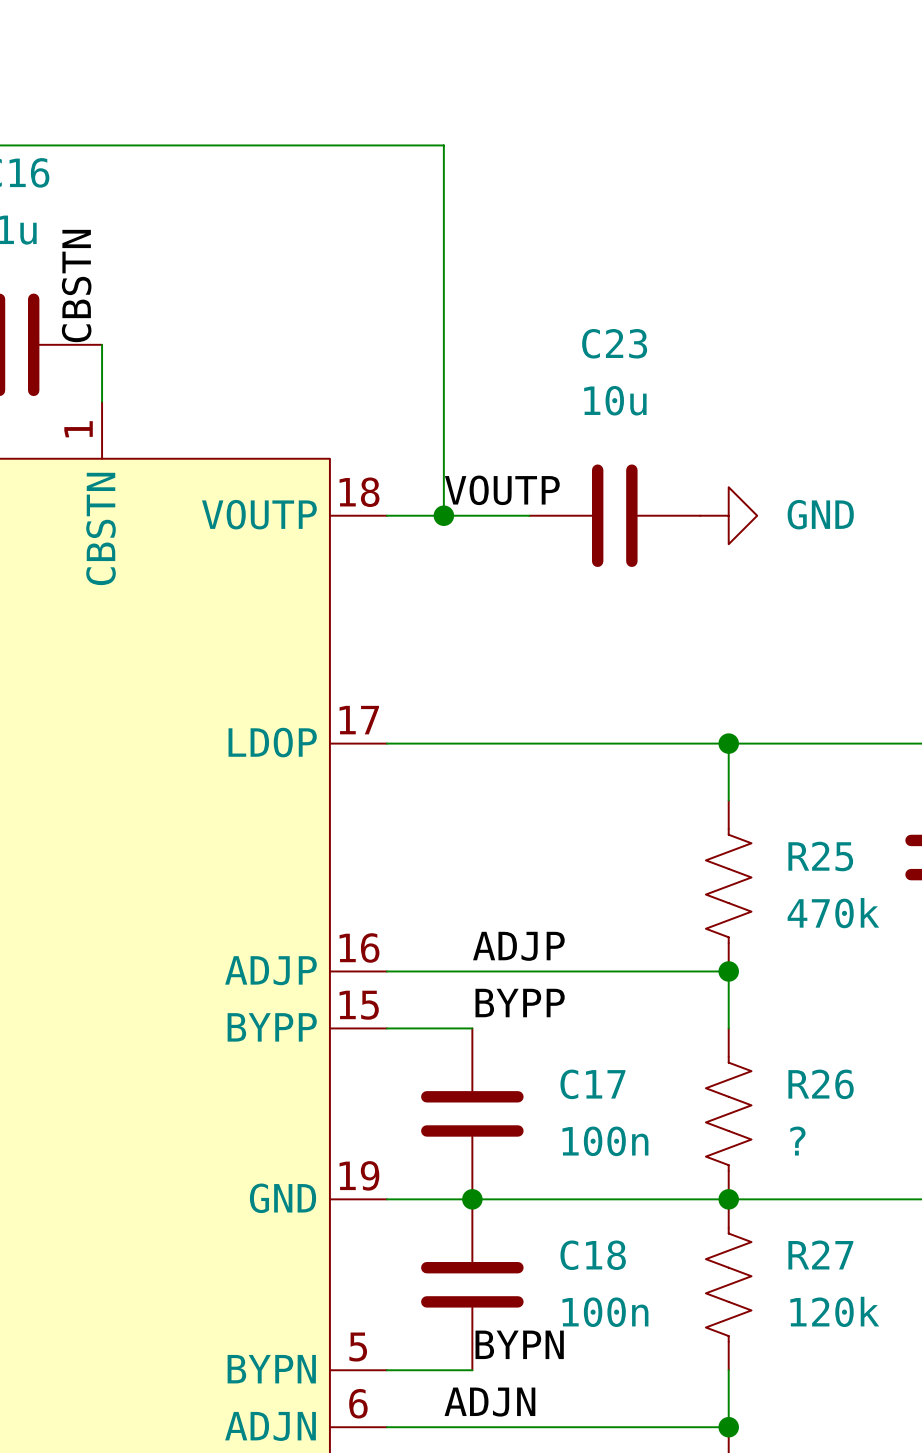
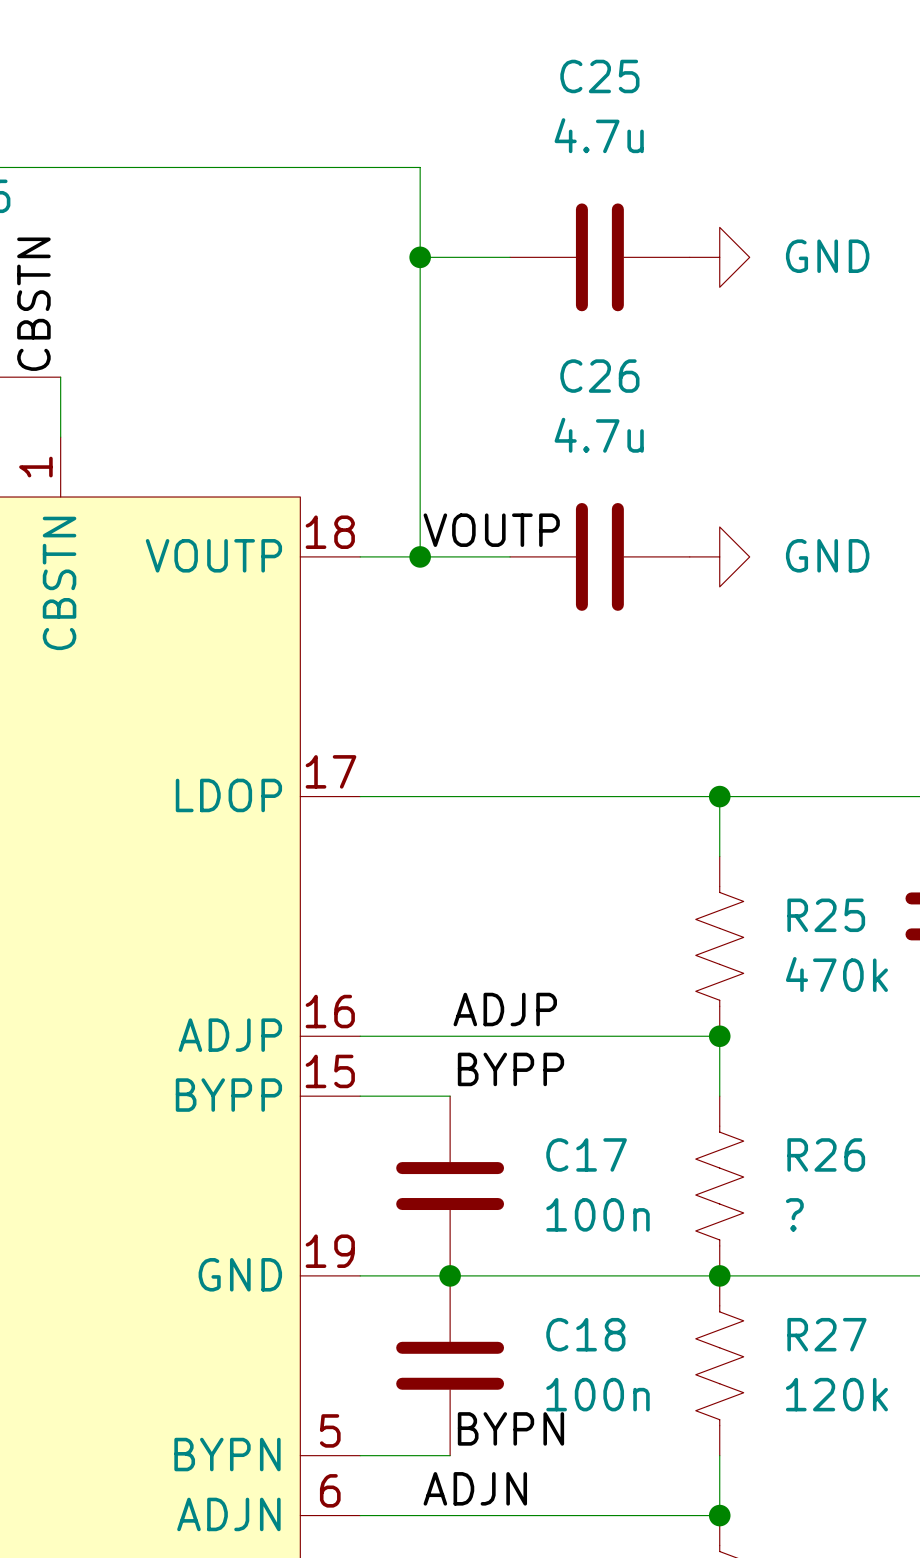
wire: none -> (420, 257) (510, 257)
junction: none -> (420, 257)
C25: none -> 4.7u (599, 257)
power symbol: none -> GND (719, 257)
C23 name: C23 (614, 343) -> C26 (599, 376)
C23 value: 10u (615, 400) -> 4.7u (599, 435)

